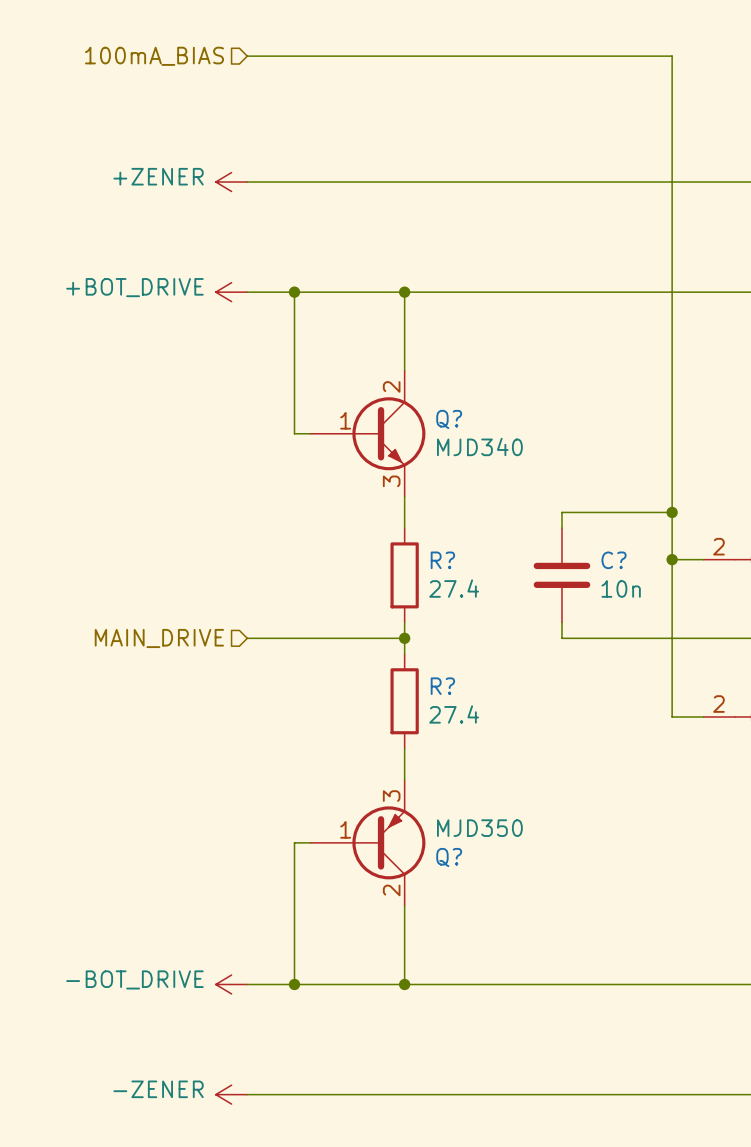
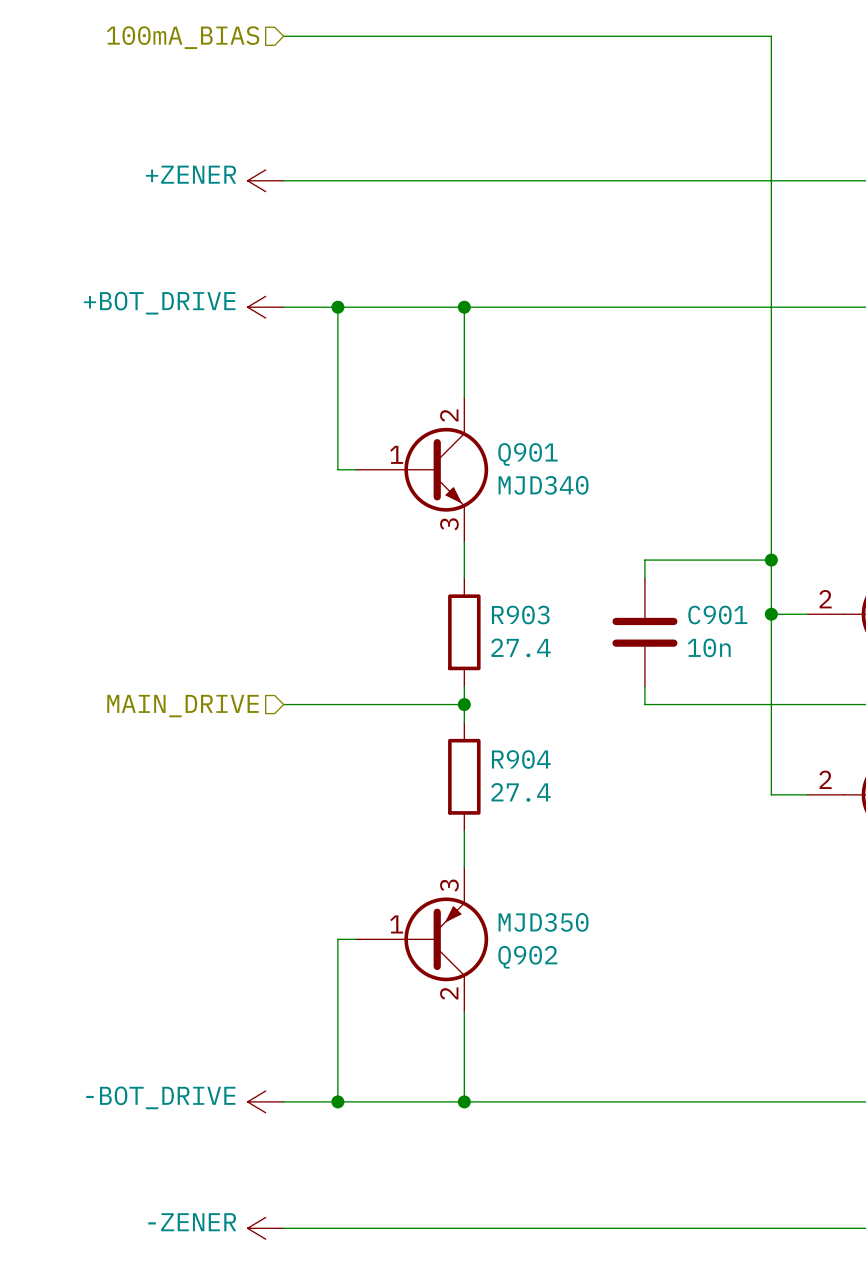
Q? name: Q? (449, 419) -> Q901 (528, 454)
R? name: R? (442, 560) -> R903 (520, 615)
C? name: C? (614, 560) -> C901 (717, 615)
R? name: R? (442, 686) -> R904 (521, 759)
Q? name: Q? (449, 857) -> Q902 (527, 957)

